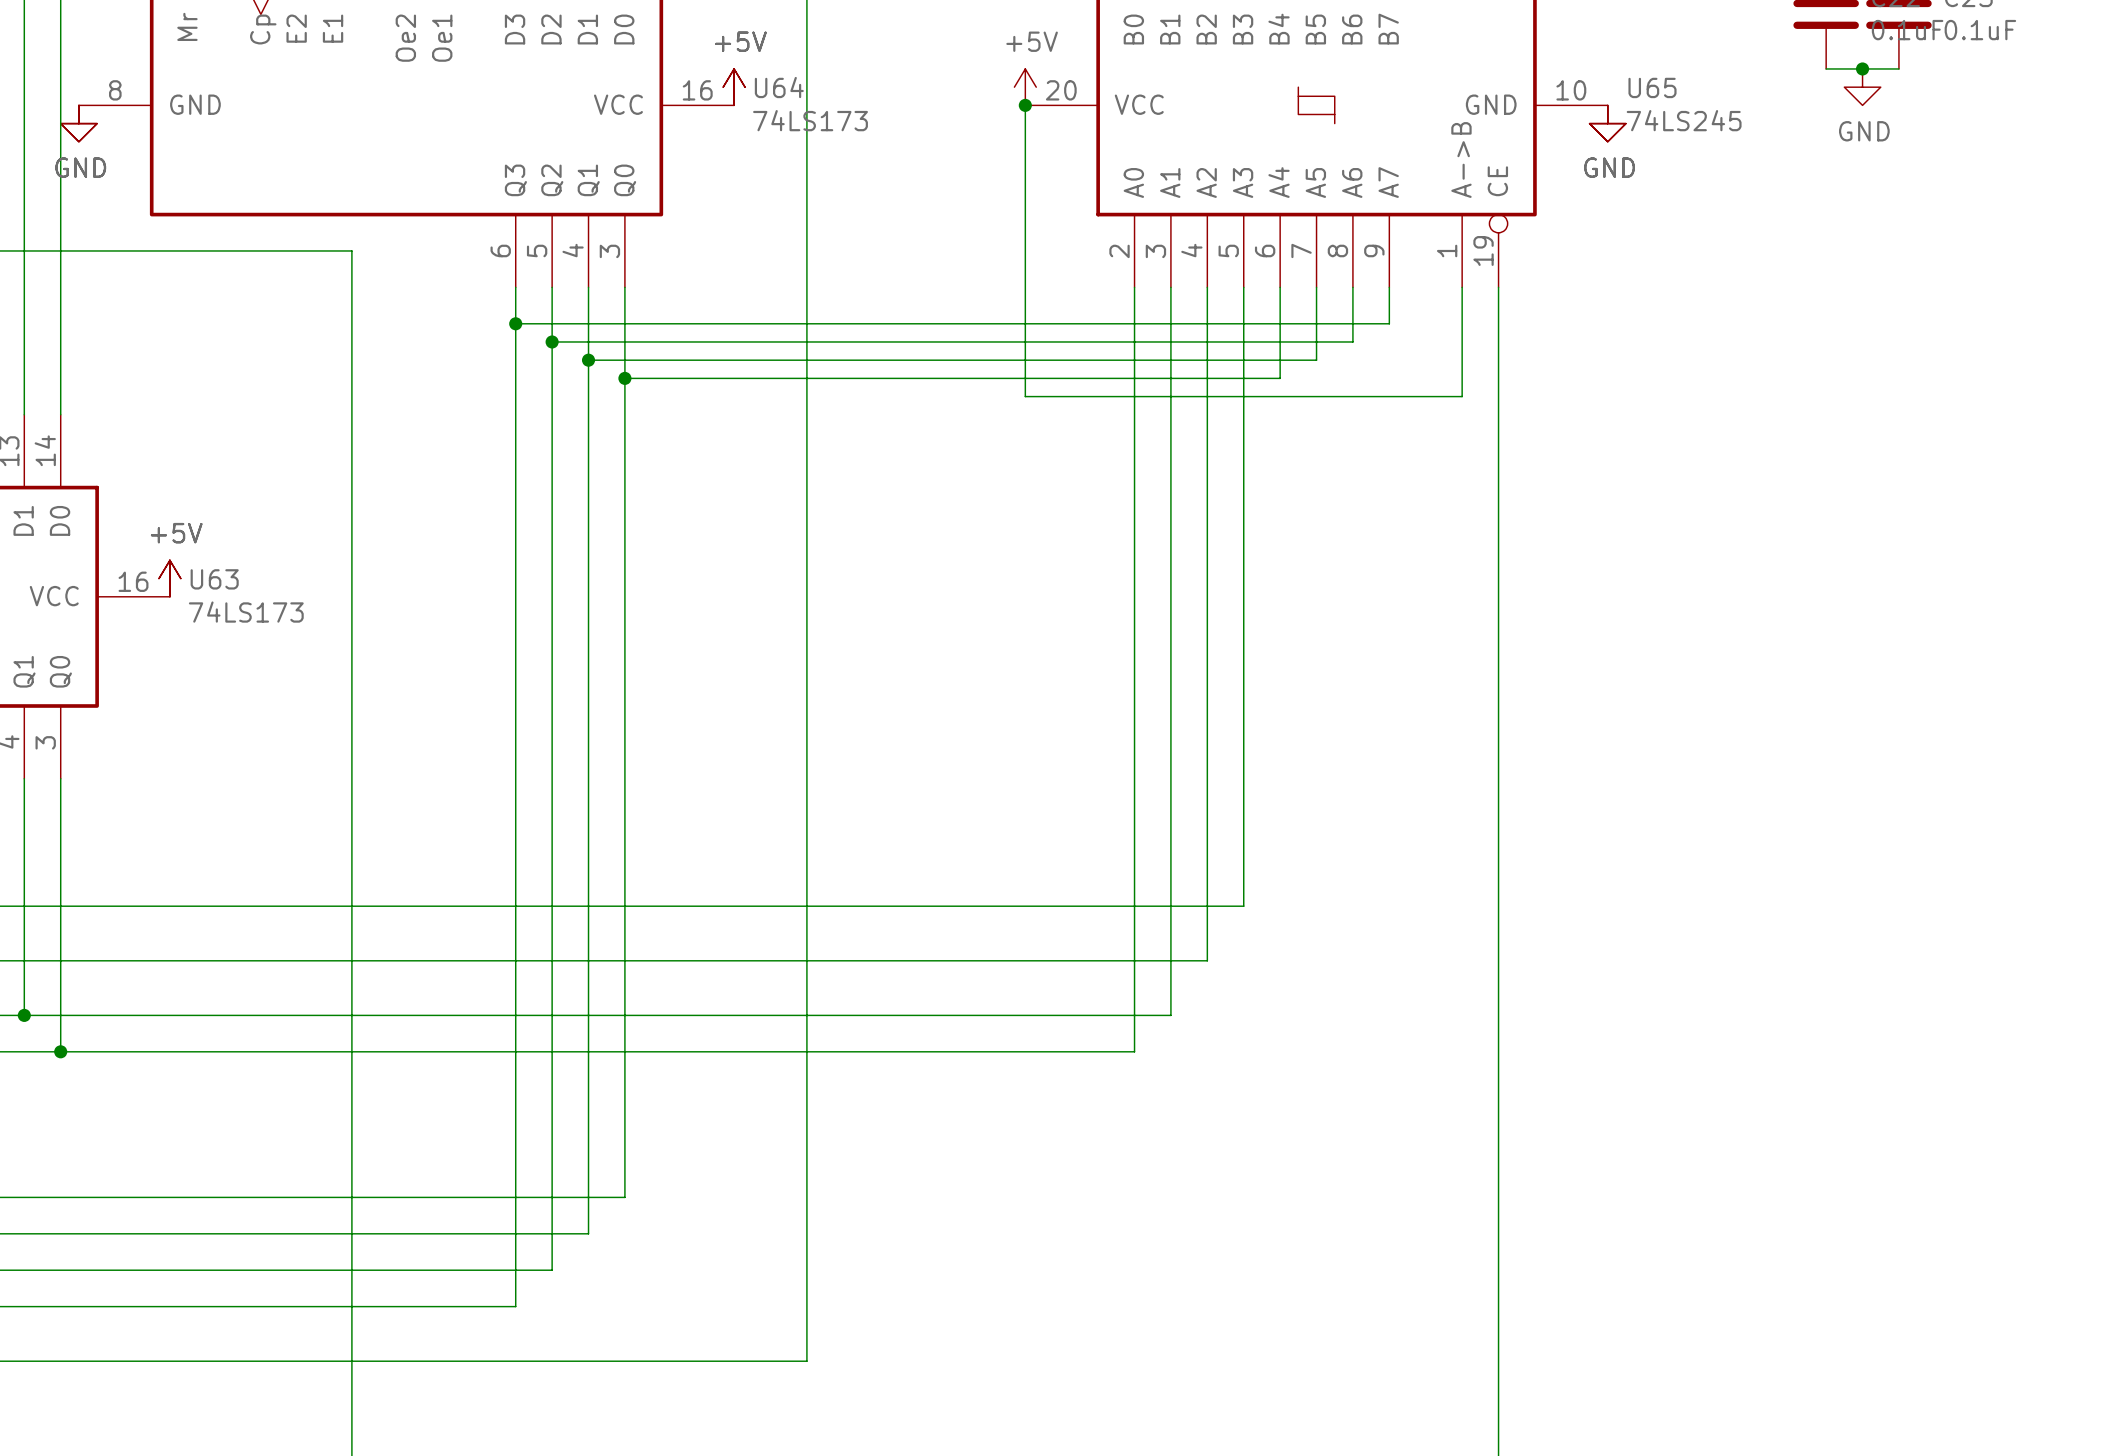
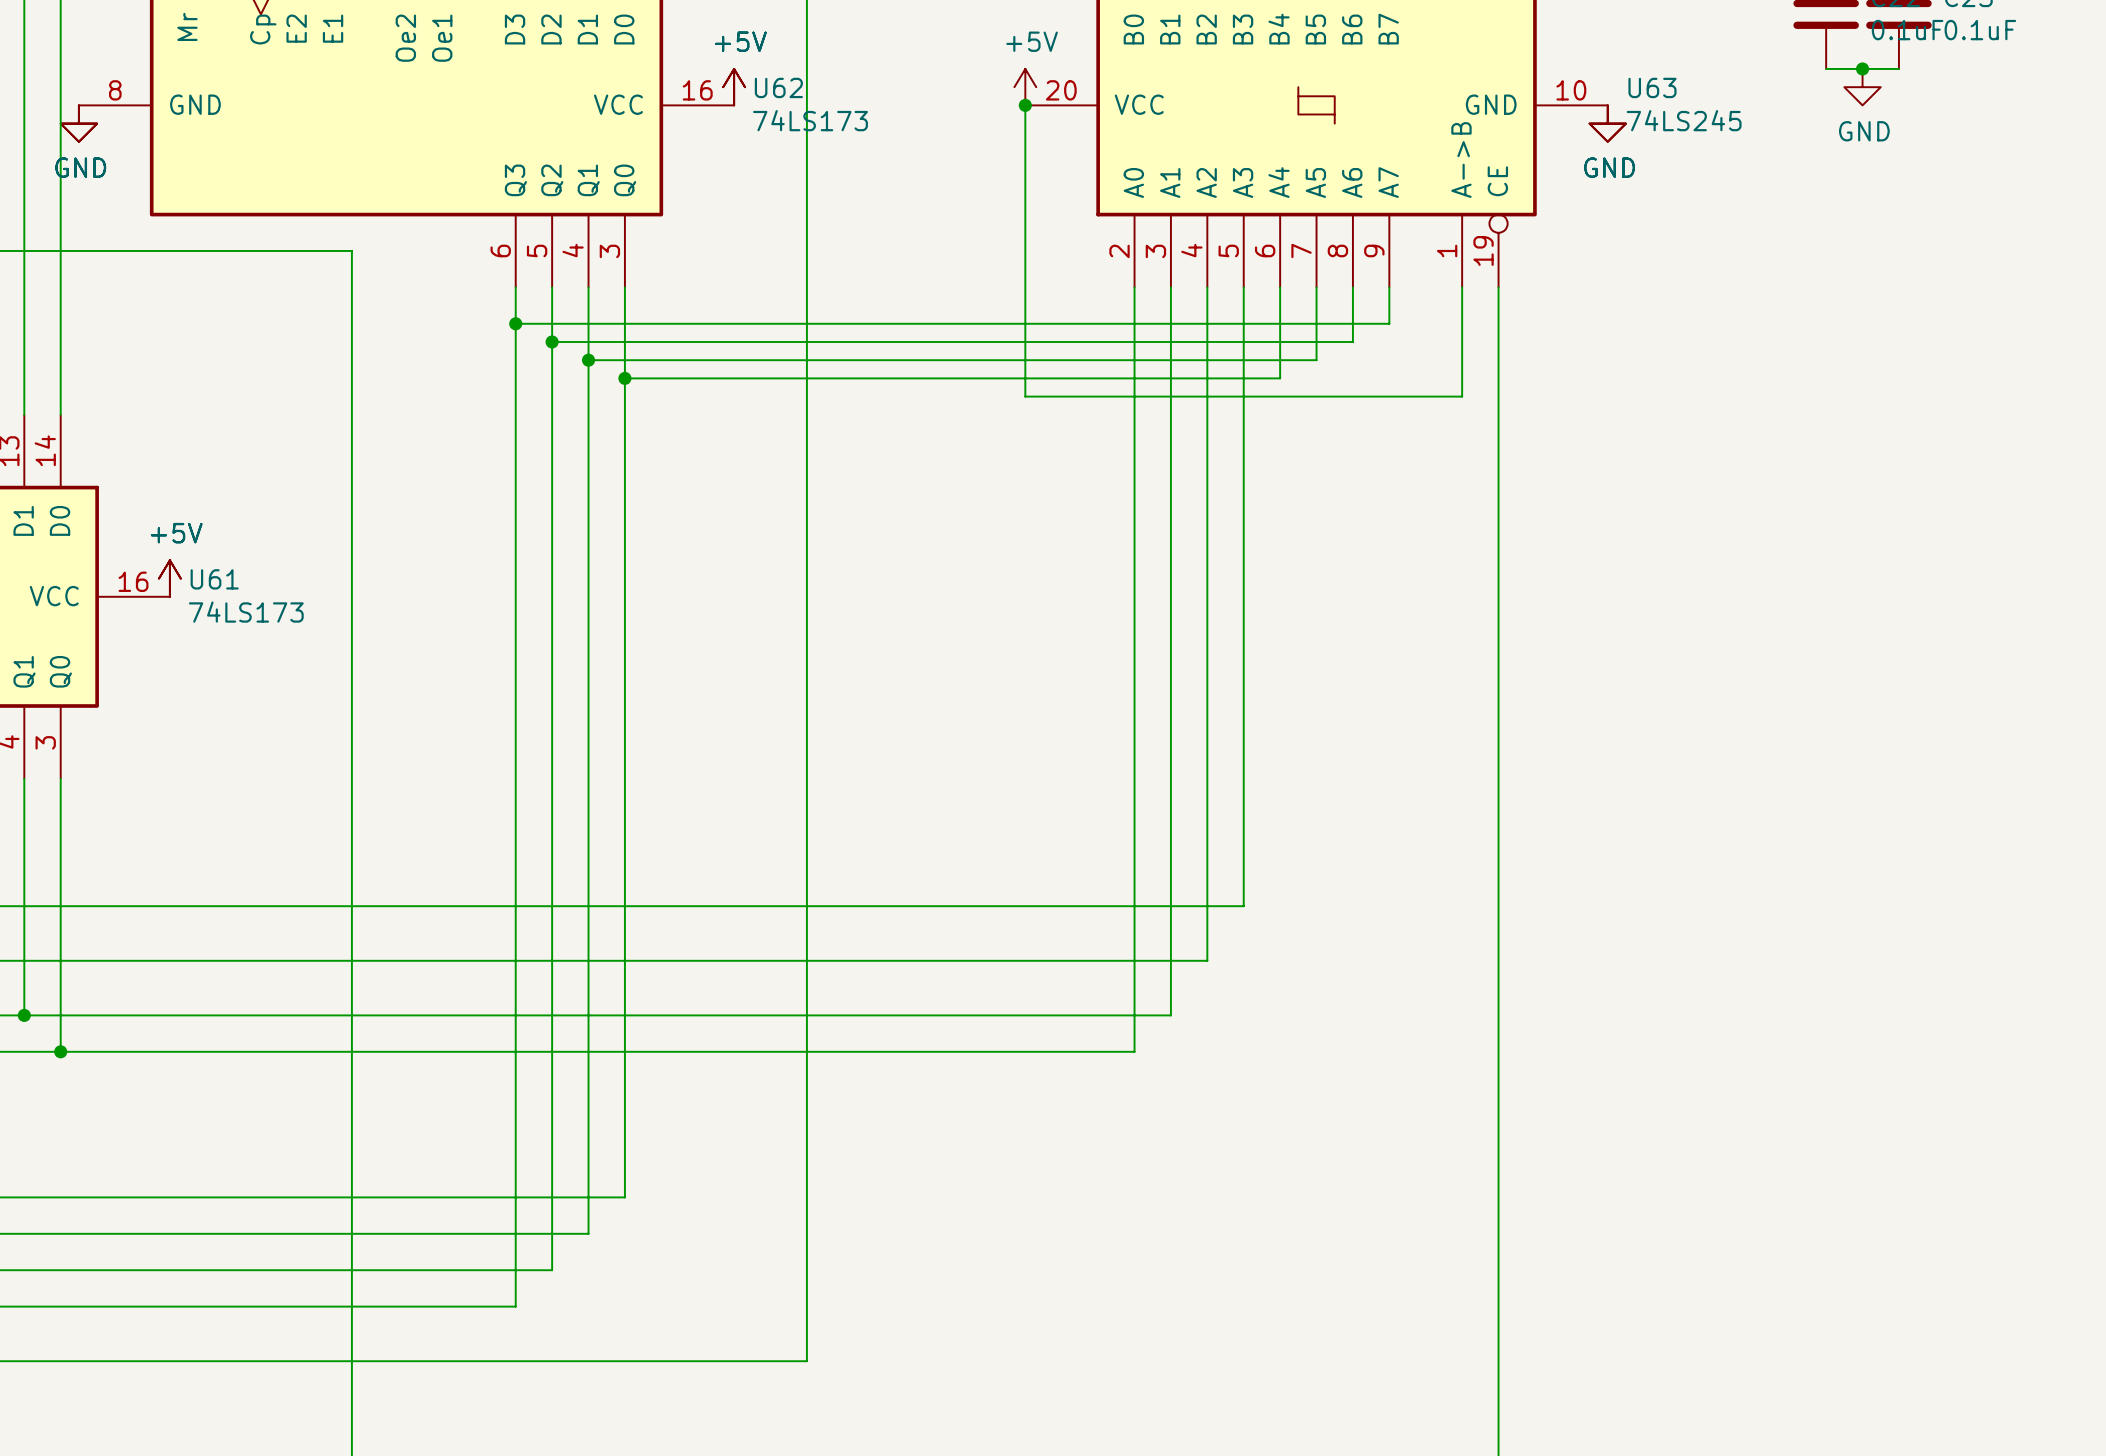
U64 name: U64 (779, 87) -> U62 (778, 87)
U65 name: U65 (1652, 87) -> U63 (1652, 87)
U63 name: U63 (214, 579) -> U61 (214, 579)

